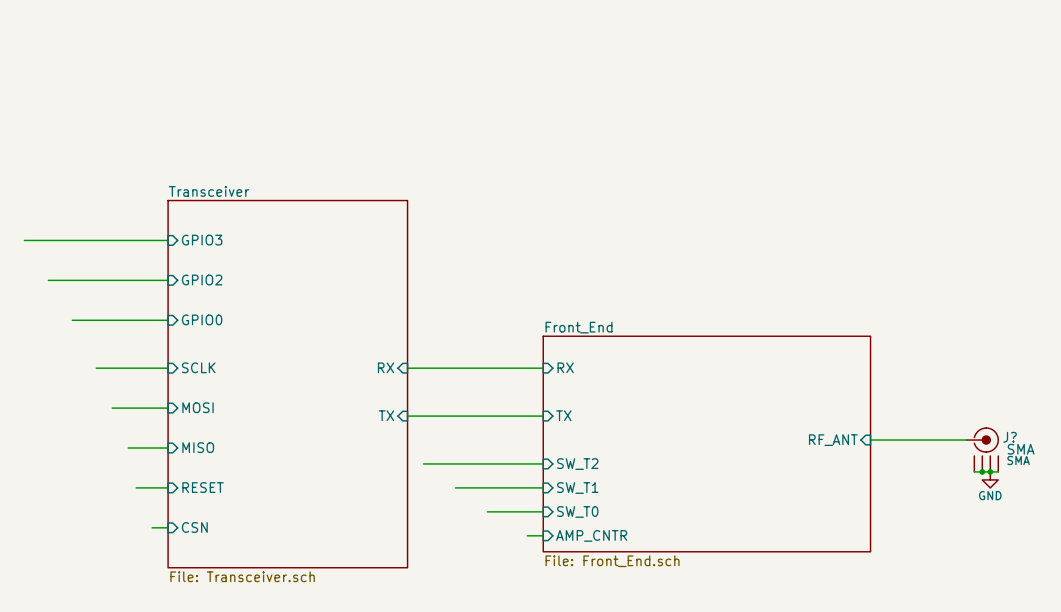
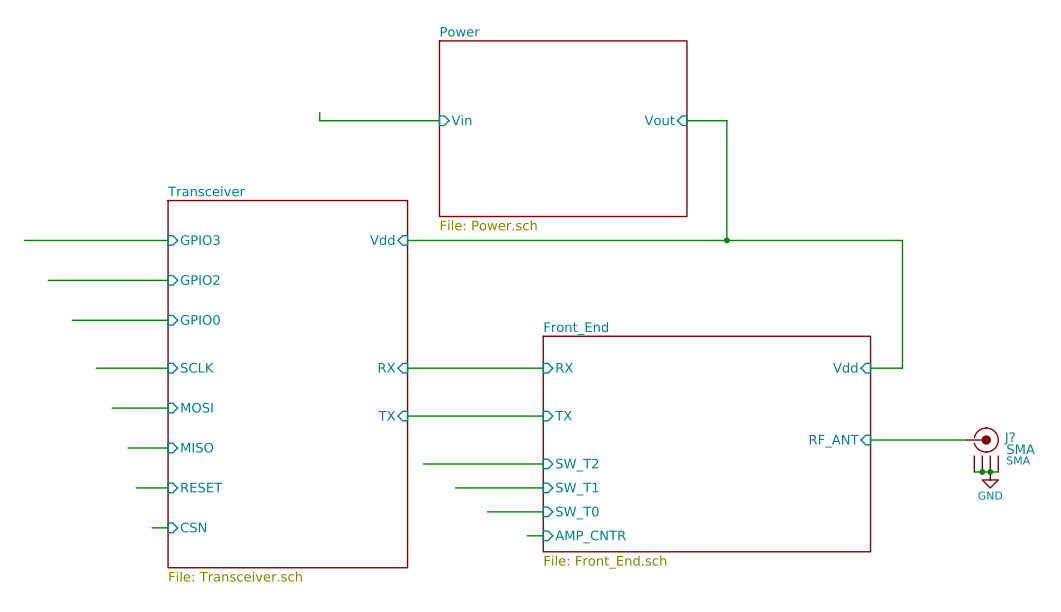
wire: none -> (319, 112) (319, 120) (439, 120)
sheet pin: none -> Vin (461, 120)
sheet pin: none -> Vout (659, 120)
wire: none -> (686, 120) (726, 120) (726, 240)
sheet Power: none -> File: Power.sch (563, 128)
sheet pin: none -> Vdd (382, 239)
wire: none -> (407, 240) (902, 240) (902, 368) (870, 368)
junction: none -> (726, 240)
sheet pin: none -> Vdd (845, 367)

